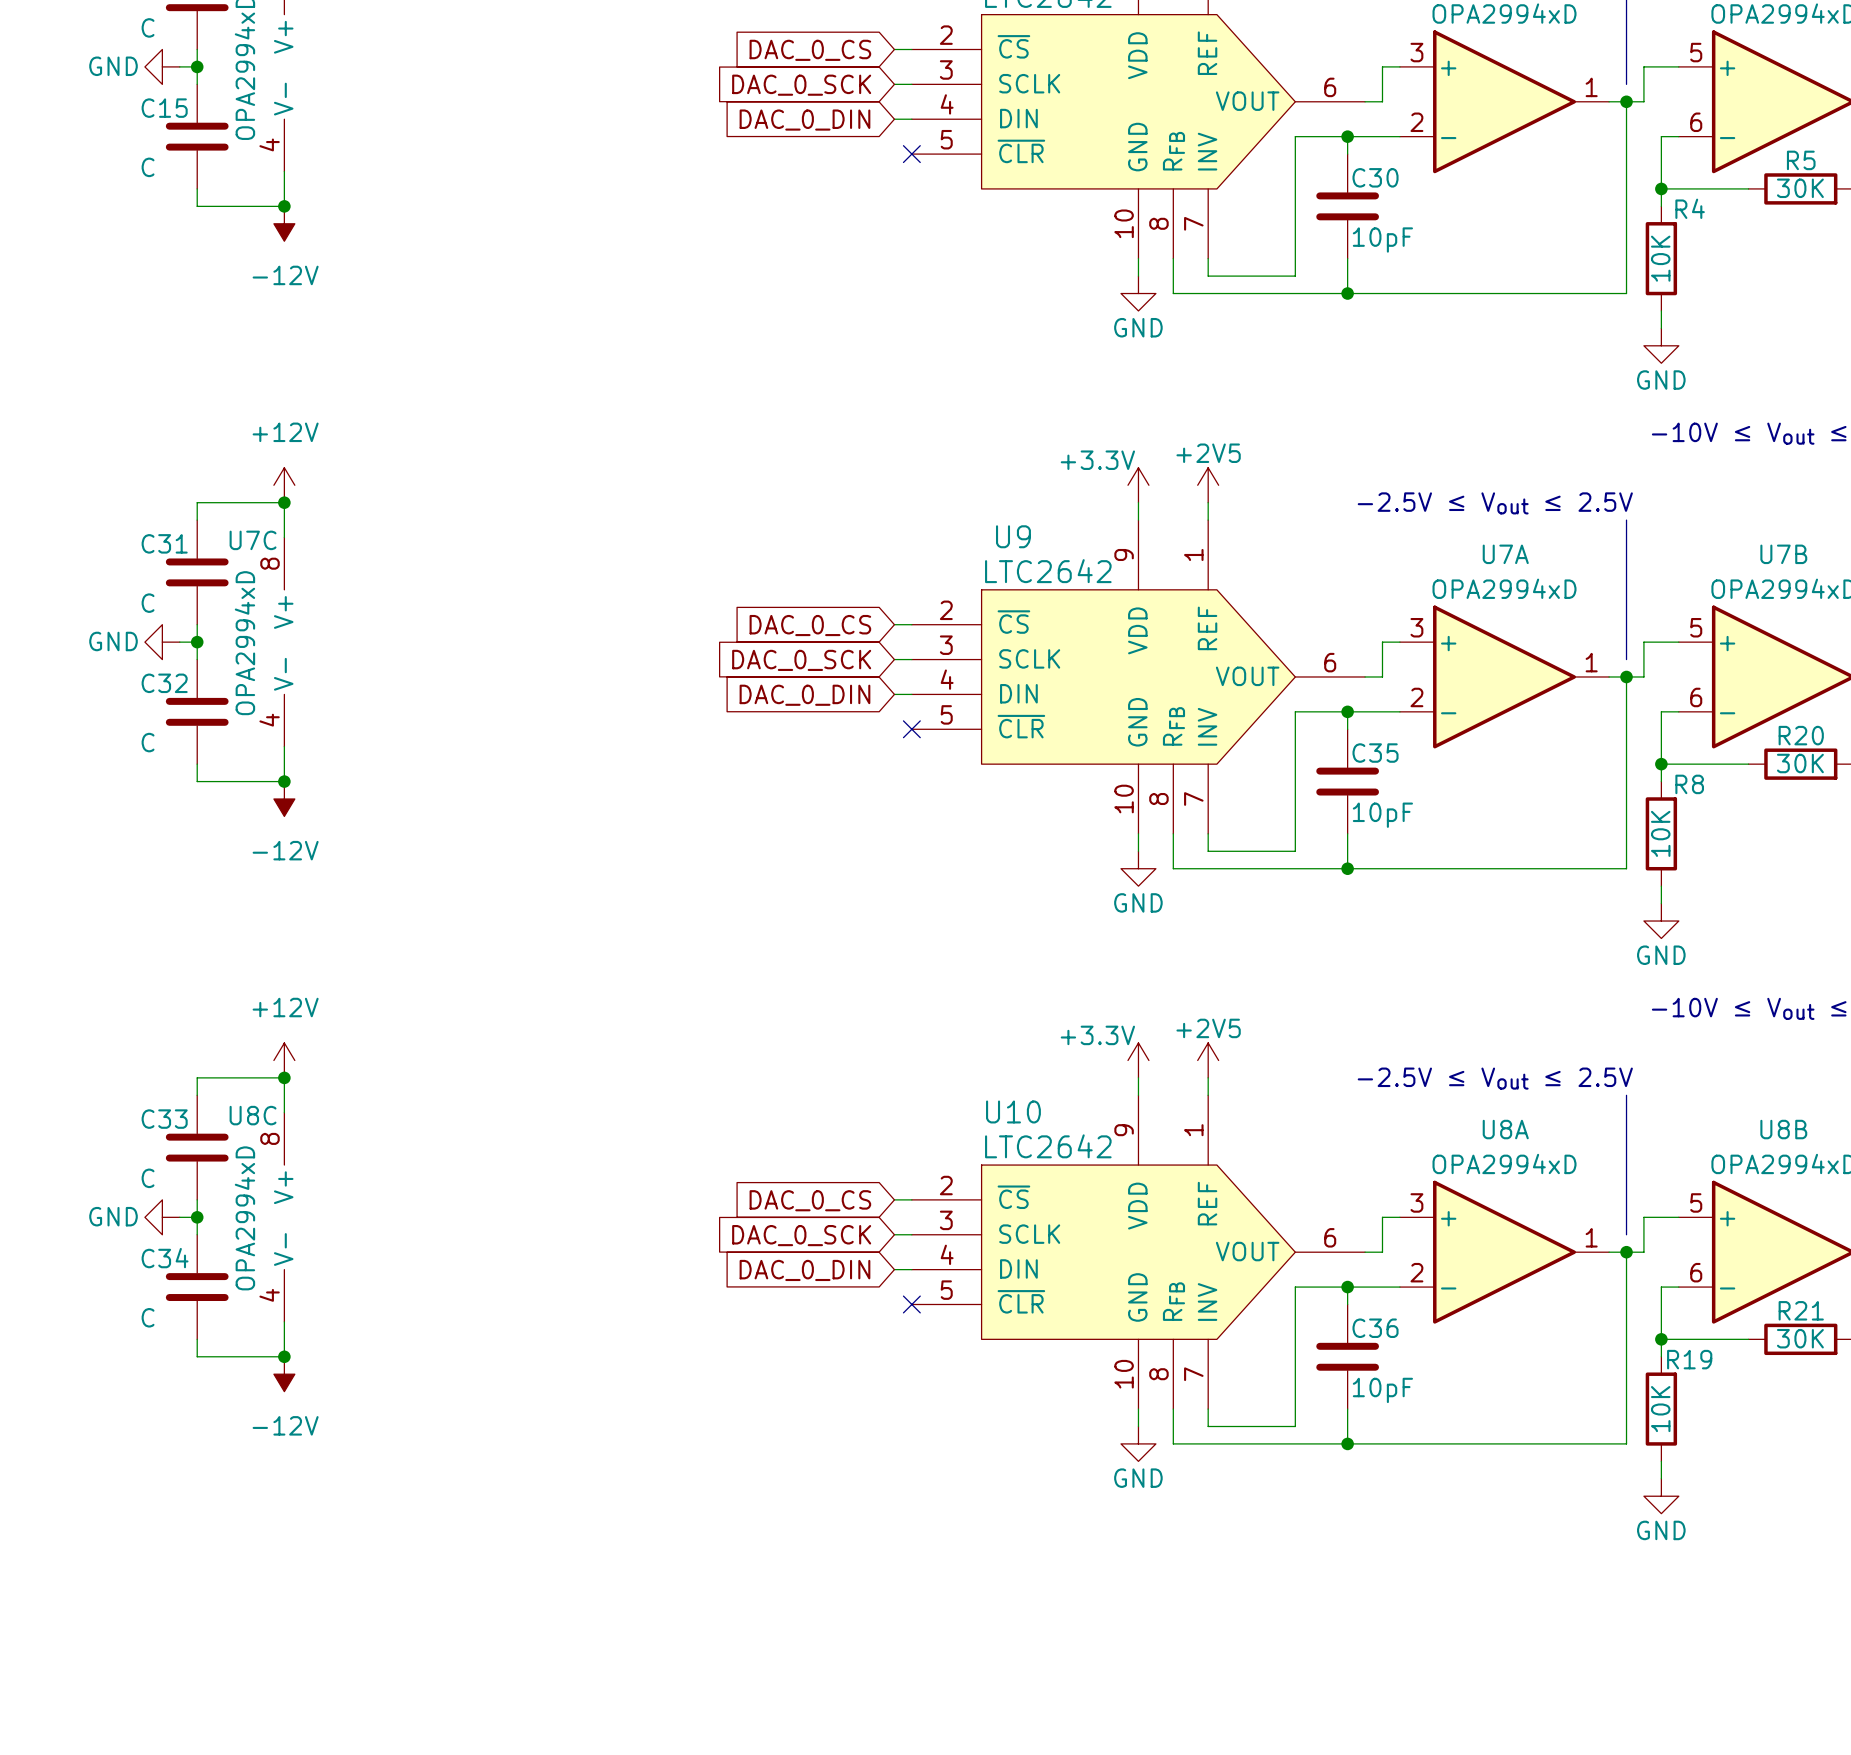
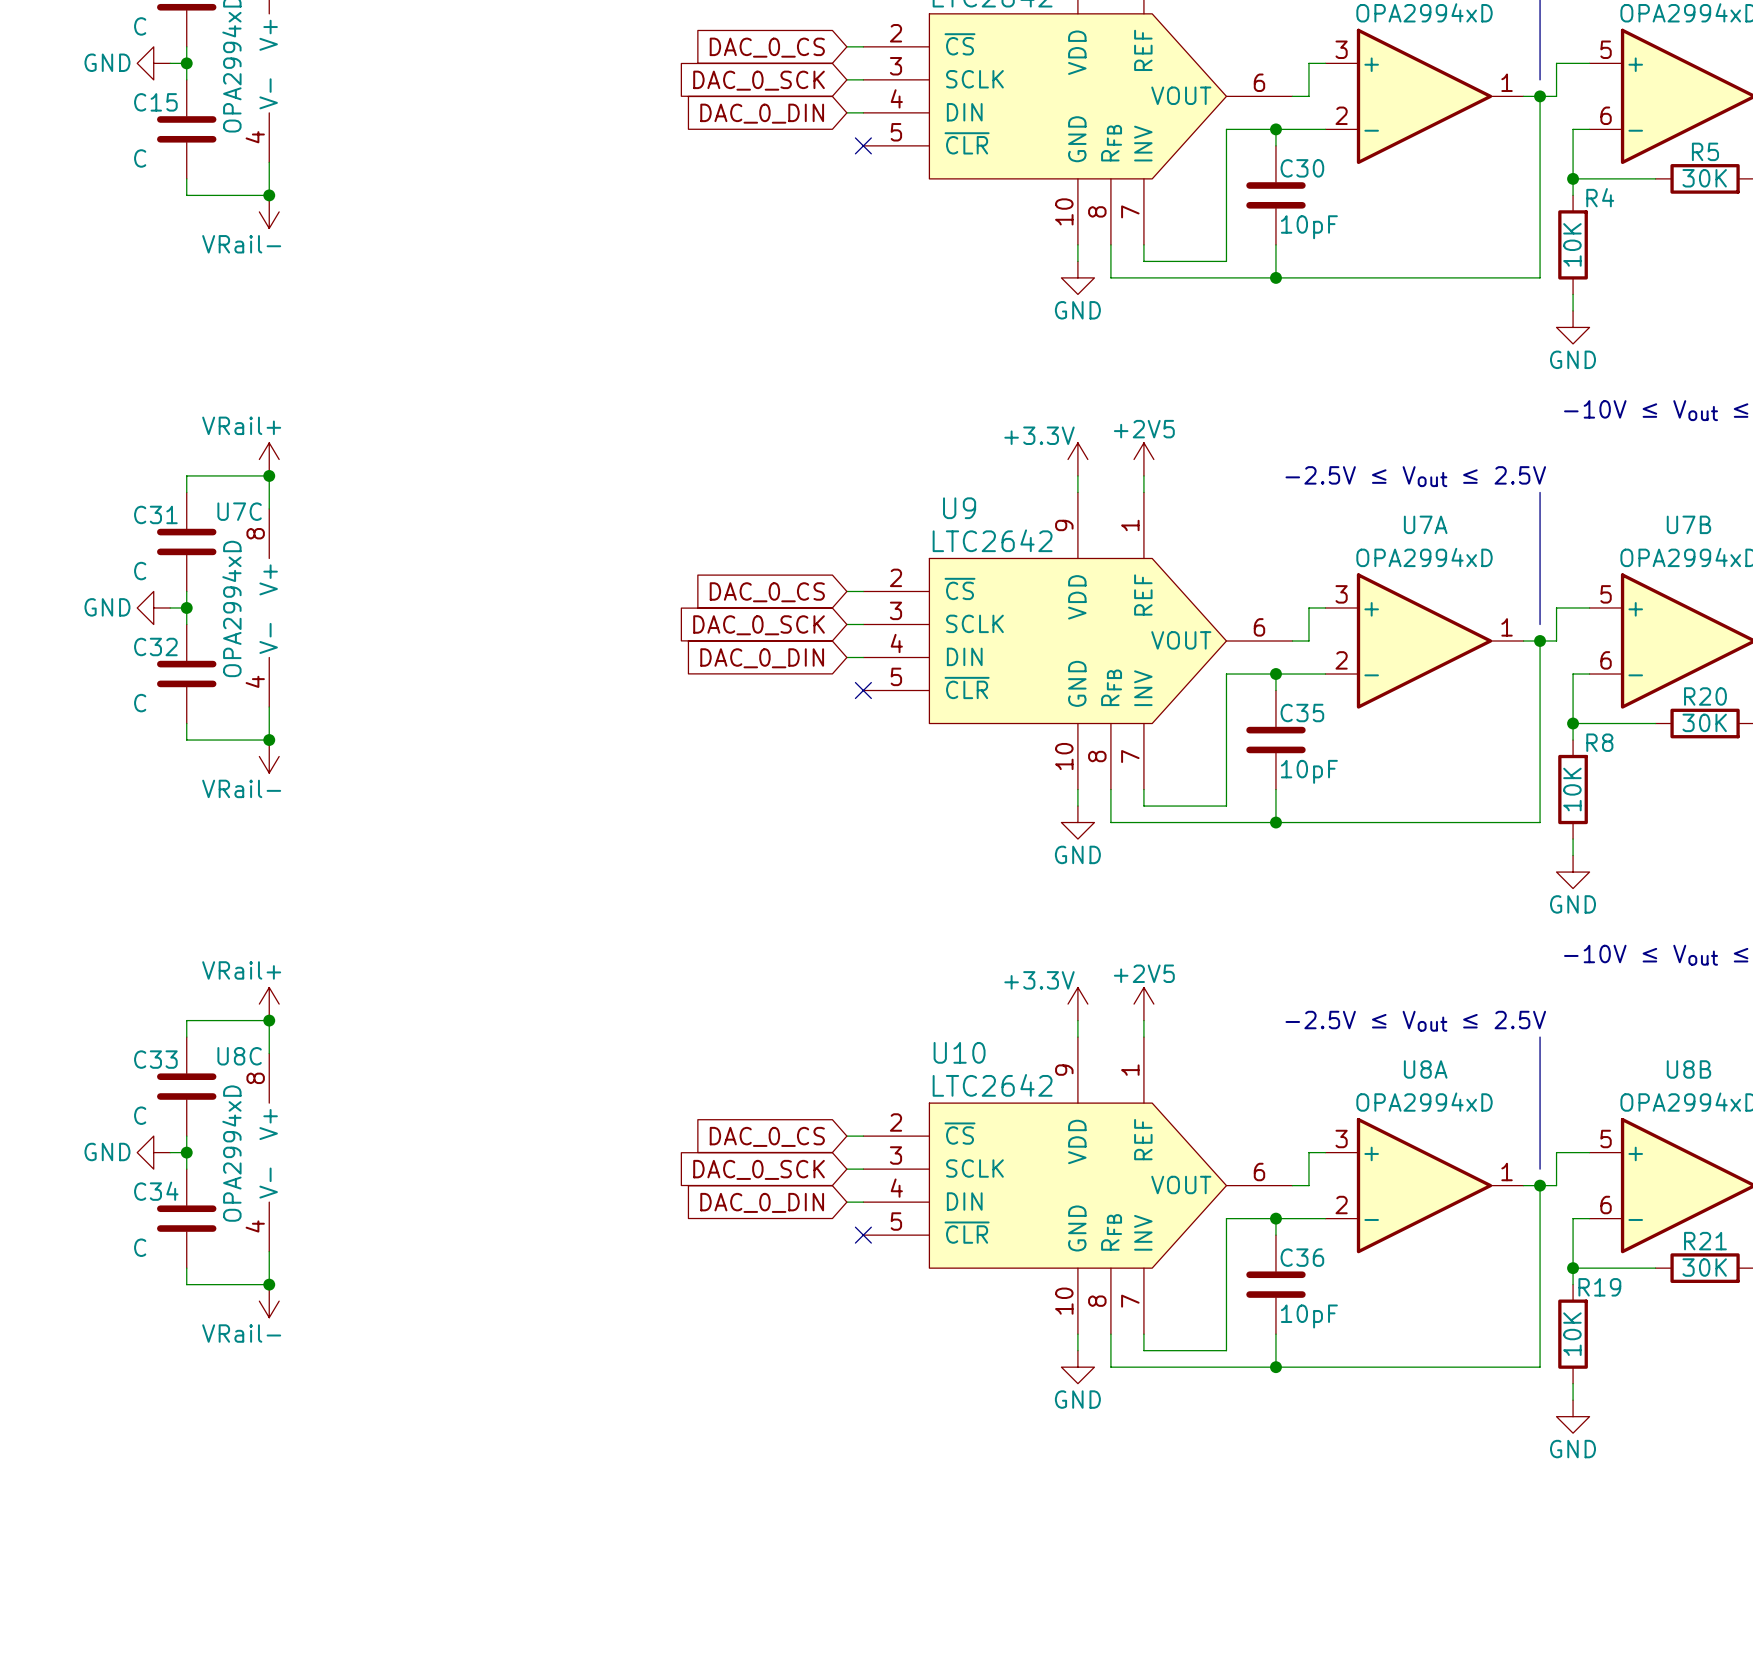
power symbol: -12V (284, 223) -> VRail- (269, 211)
power symbol: +12V (284, 485) -> VRail+ (269, 459)
power symbol: -12V (284, 799) -> VRail- (269, 756)
power symbol: +12V (284, 1060) -> VRail+ (269, 1004)
power symbol: -12V (284, 1374) -> VRail- (269, 1301)

